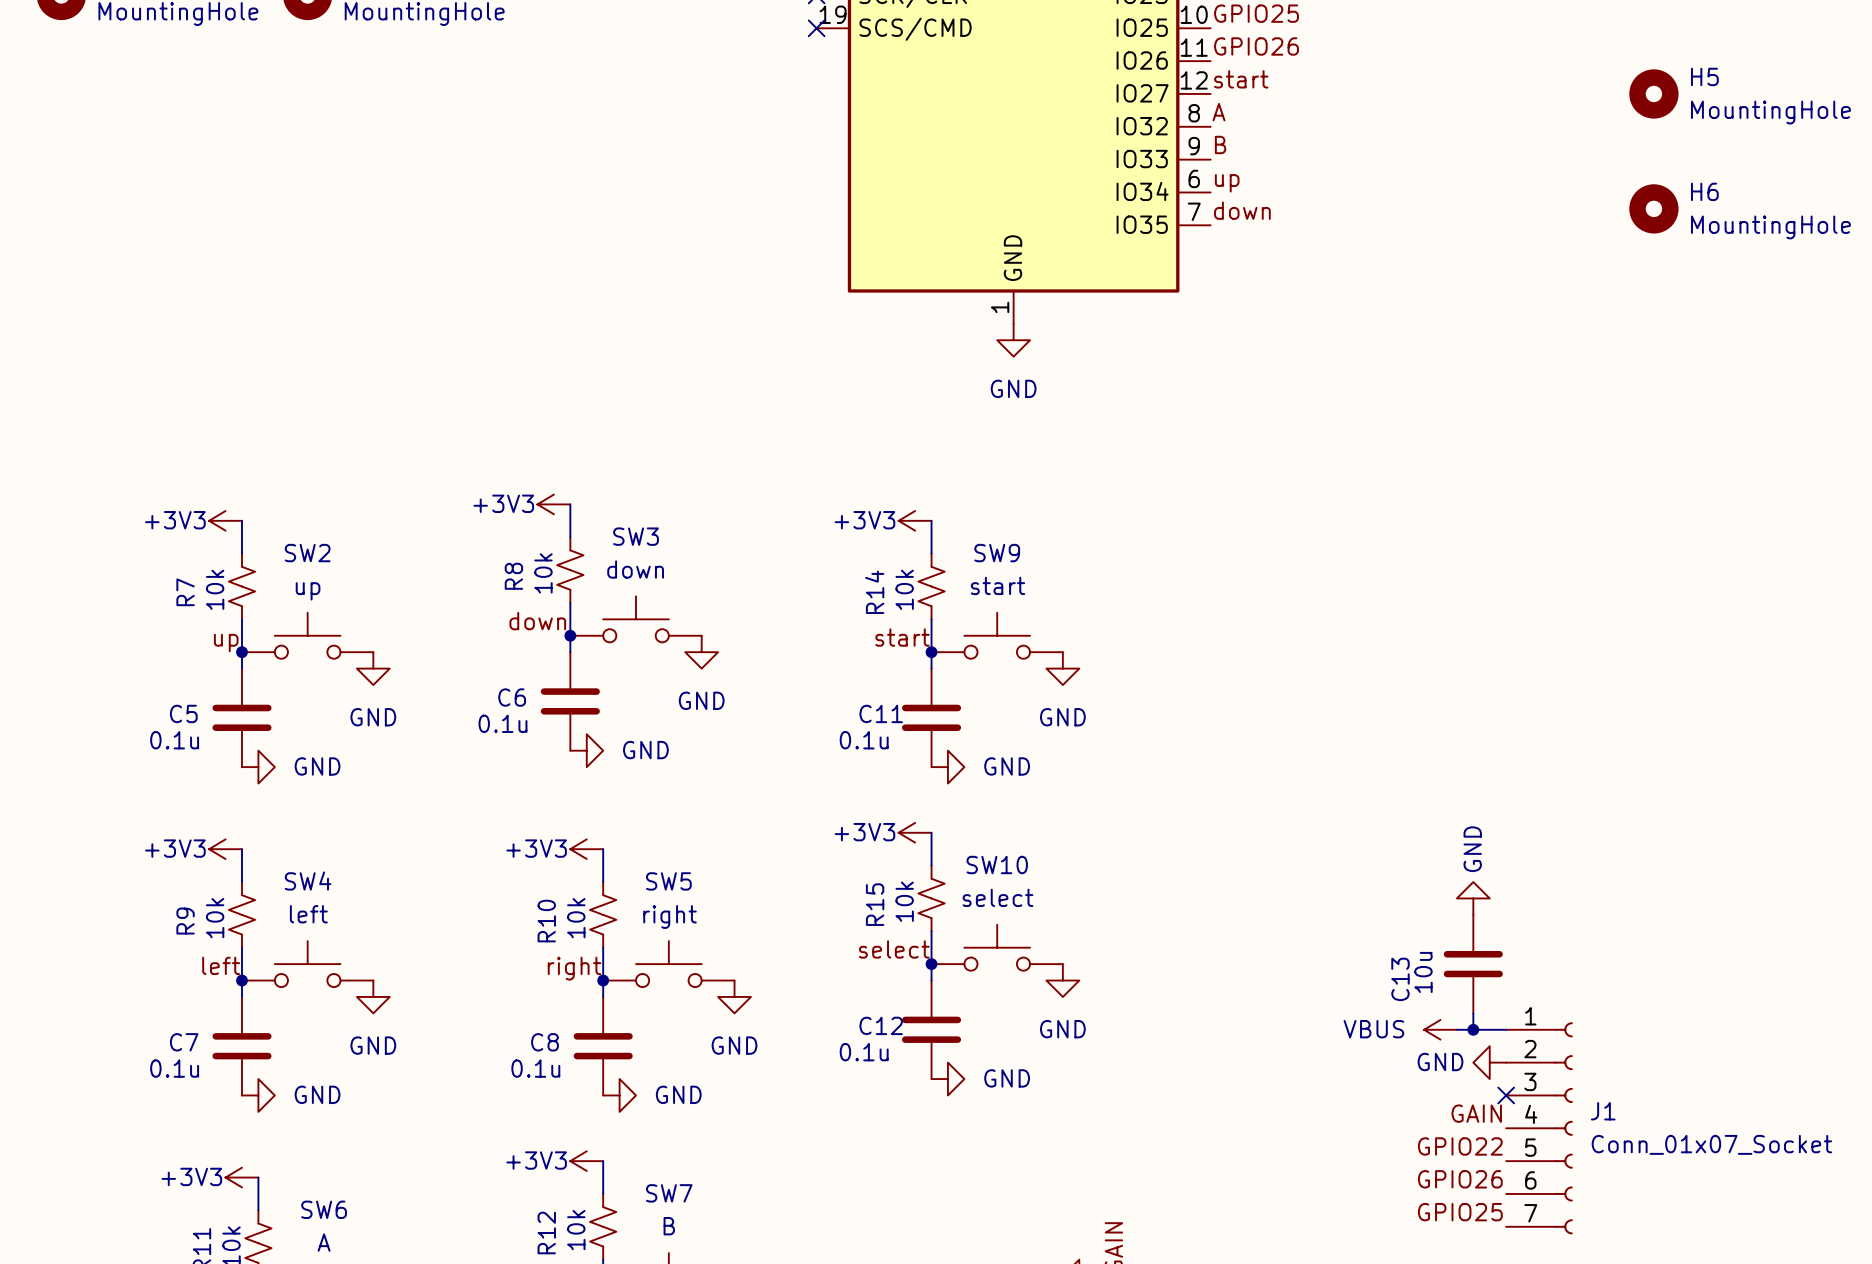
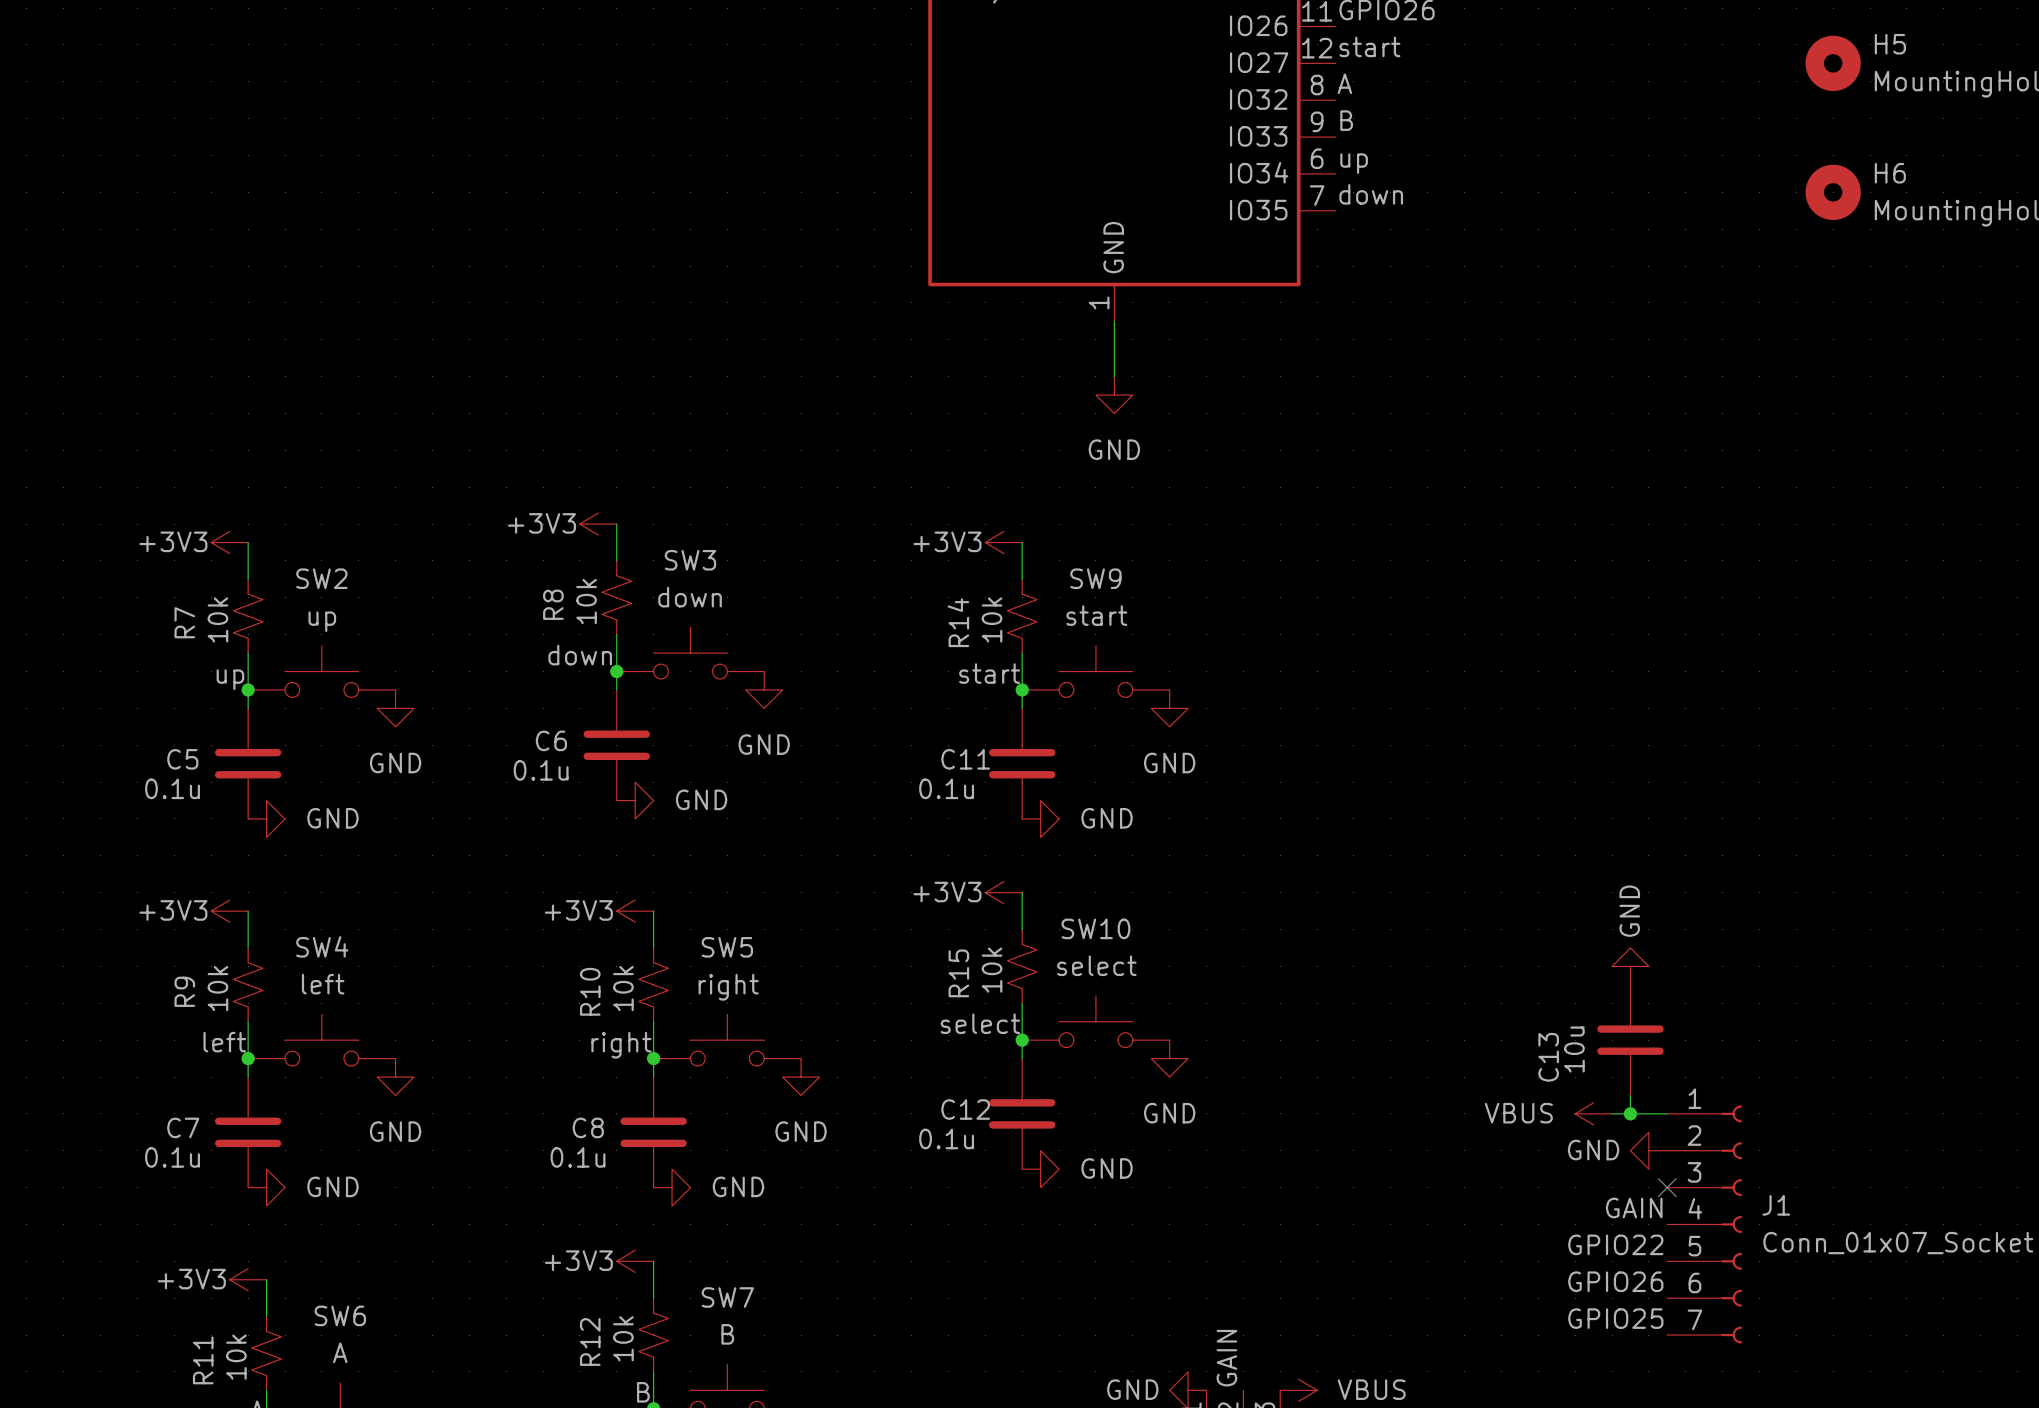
wire: none -> (1114, 321) (1114, 376)
power symbol position: GND (1013, 340) -> GND (1114, 395)

